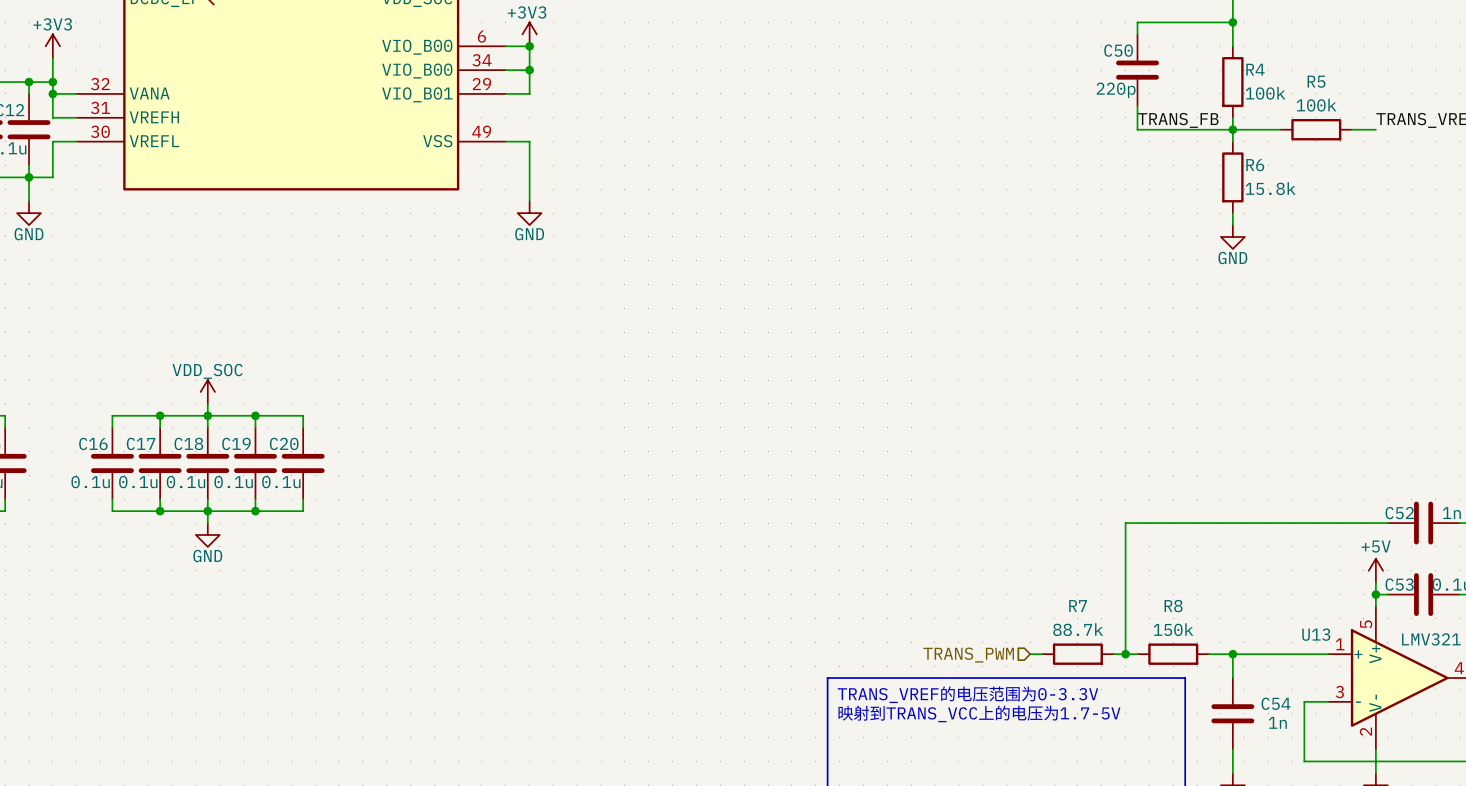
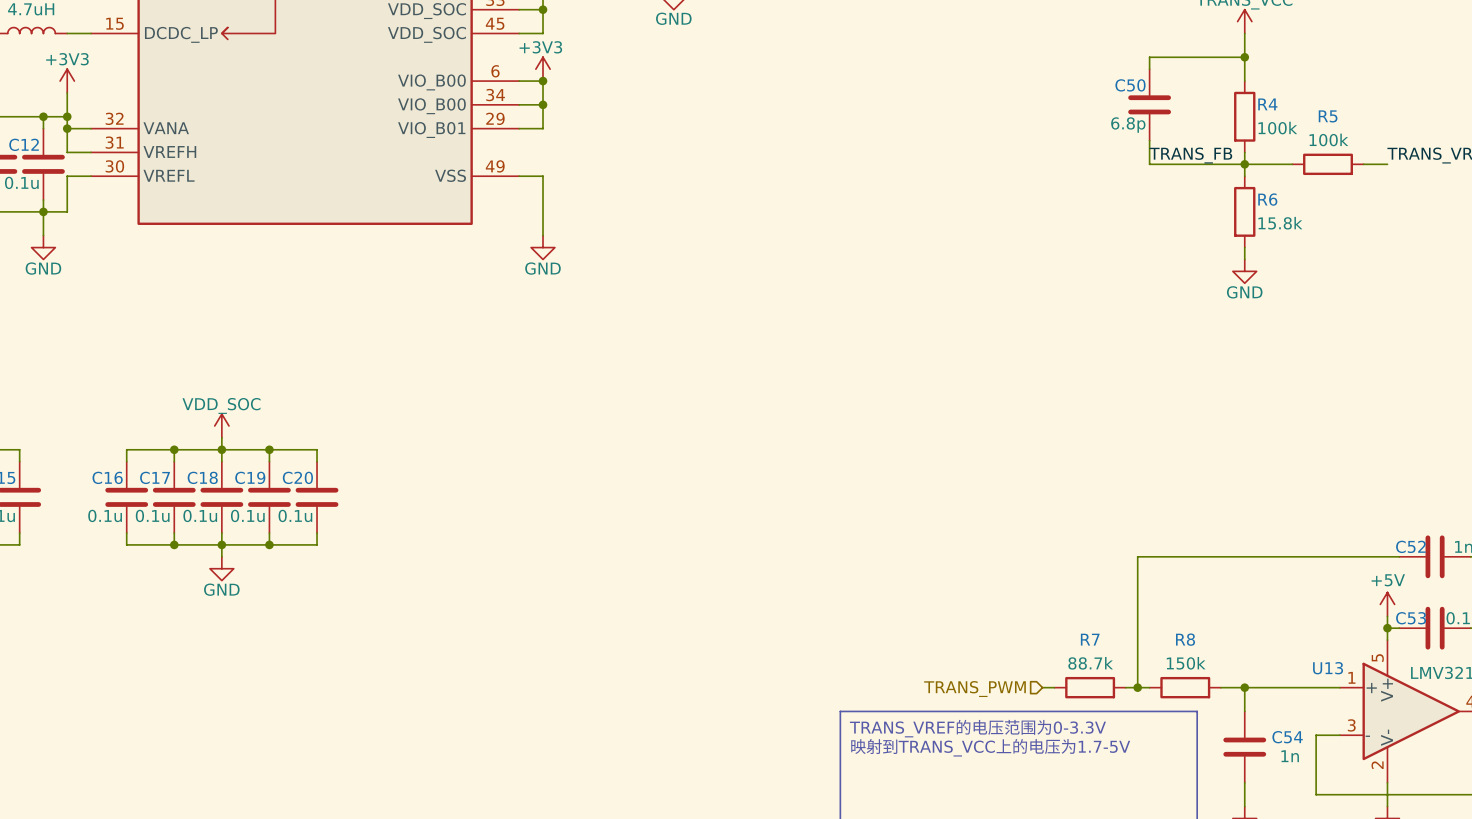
C50 value: 220p (1116, 90) -> 6.8p (1128, 125)

